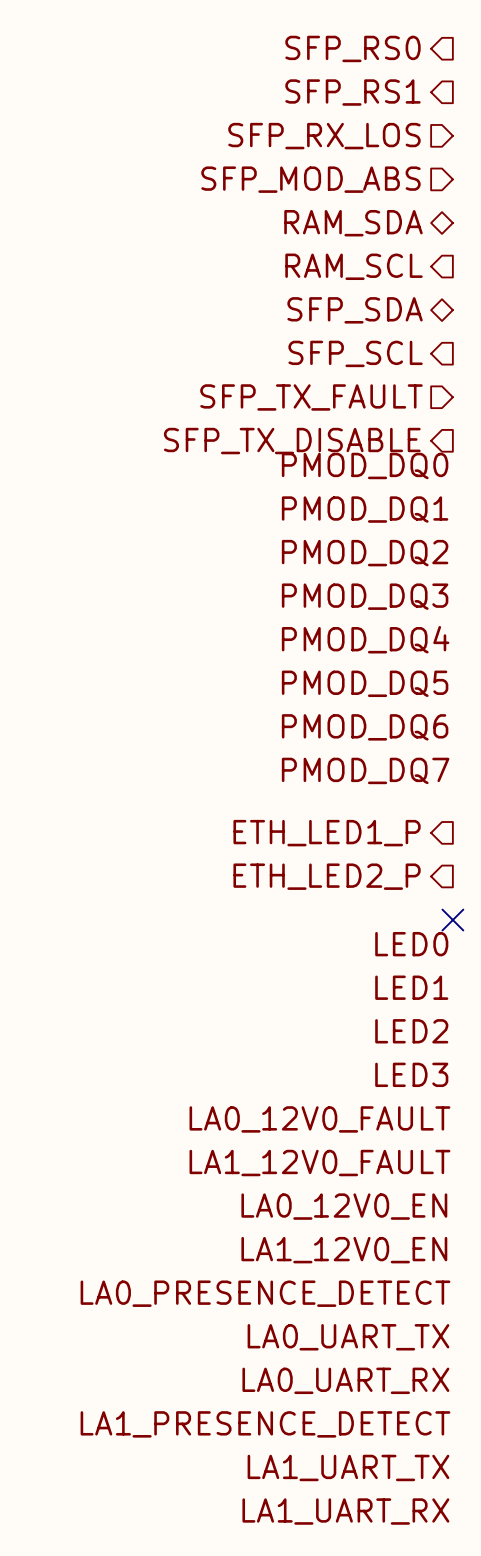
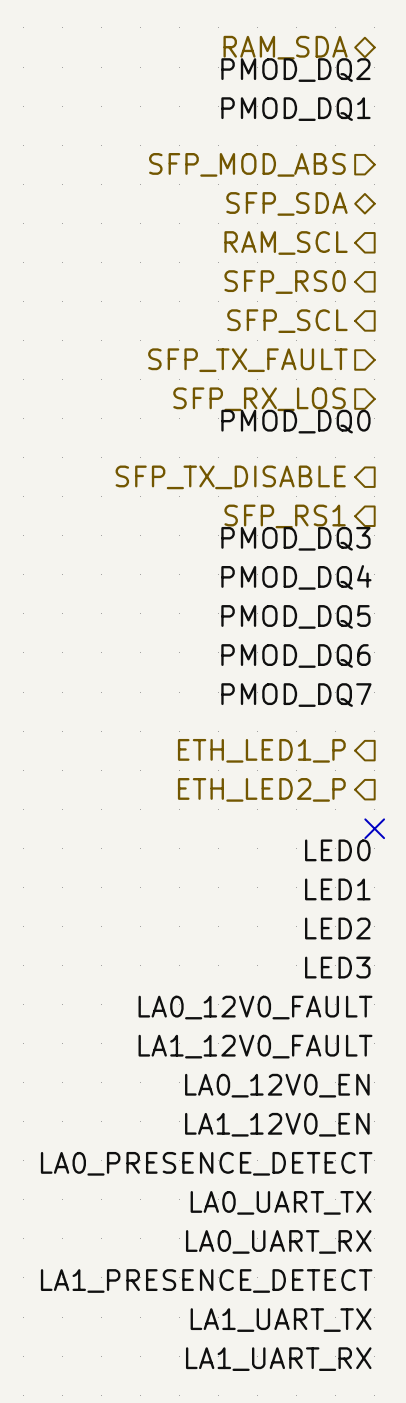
hierarchical label shape: output (352, 48) -> bidirectional (285, 47)
hierarchical label: SFP_RS0 (352, 48) -> RAM_SDA (285, 47)
label: none -> PMOD_DQ2 (295, 70)
hierarchical label: SFP_RS1 (352, 92) -> none
hierarchical label: SFP_RX_LOS (324, 136) -> none
hierarchical label: RAM_SDA (353, 223) -> SFP_SDA (286, 203)
hierarchical label shape: bidirectional (355, 310) -> output (285, 282)
hierarchical label: SFP_SDA (355, 310) -> SFP_RS0 (285, 282)
hierarchical label shape: output (292, 441) -> input (259, 399)
hierarchical label: SFP_TX_DISABLE (292, 441) -> SFP_RX_LOS (259, 399)
label position: PMOD_DQ1 (365, 509) -> PMOD_DQ1 (295, 109)
hierarchical label: none -> SFP_TX_DISABLE (230, 477)
label: PMOD_DQ2 (365, 553) -> none
hierarchical label: none -> SFP_RS1 (285, 516)

